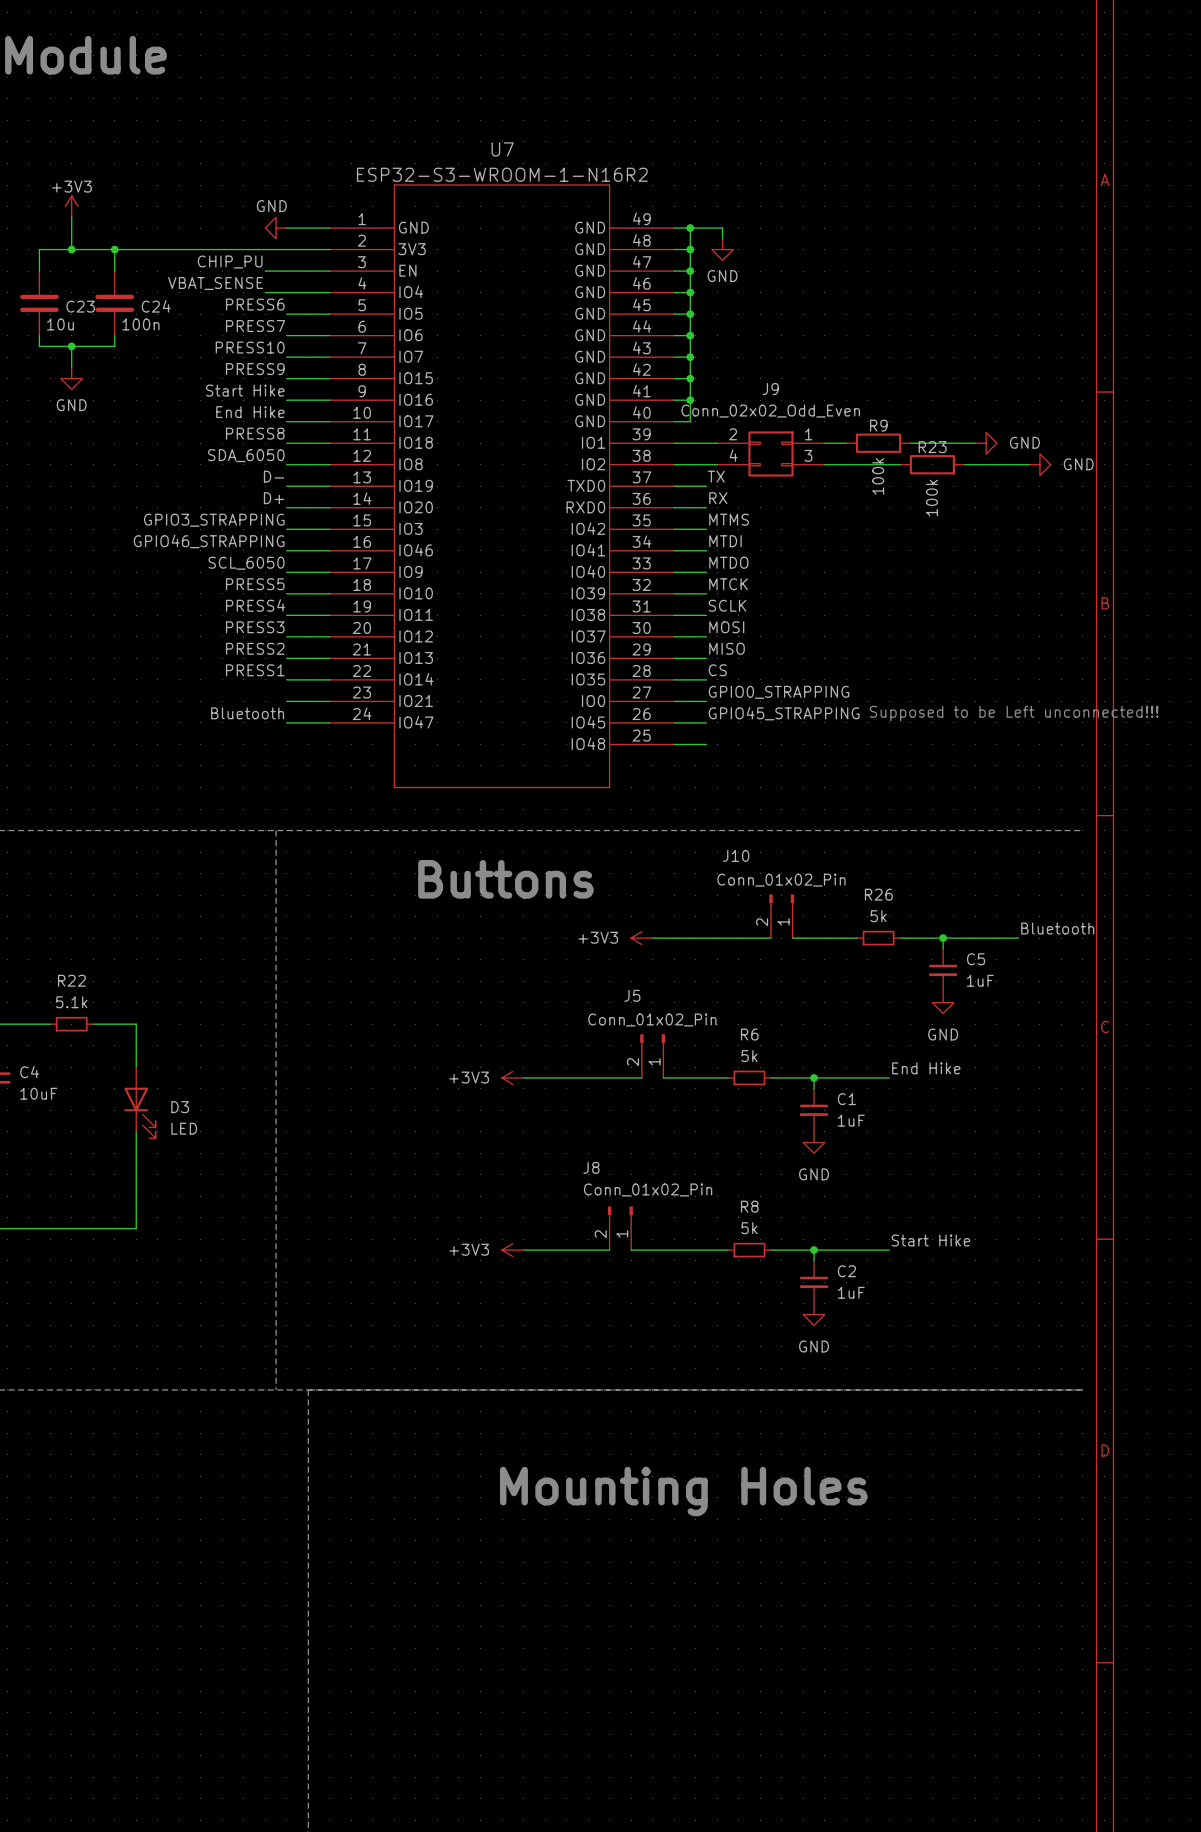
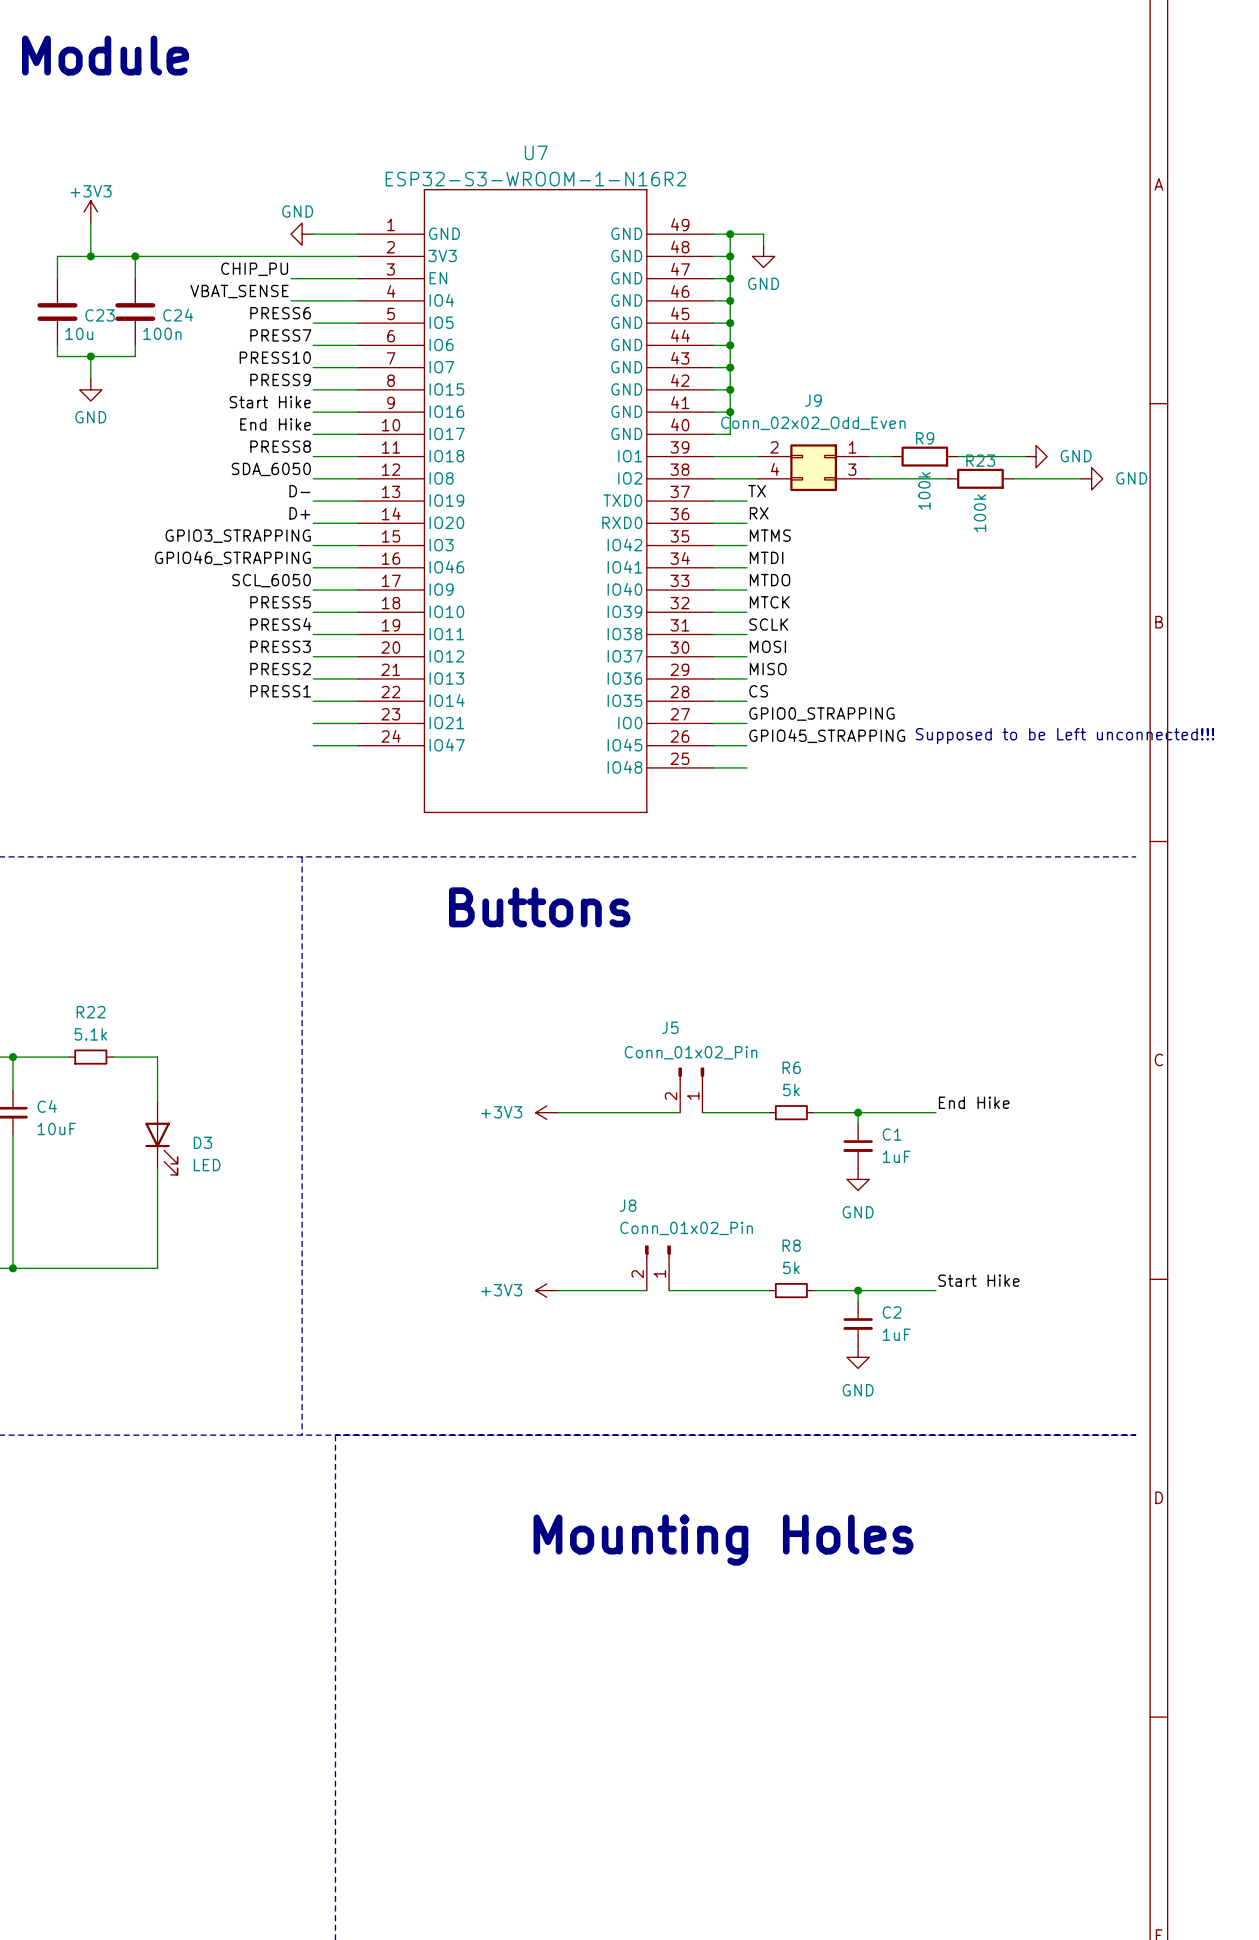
label: Bluetooth (247, 713) -> none
J10: Conn_01x02_Pin (781, 916) -> none
label: Bluetooth (1057, 928) -> none
power symbol: +3V3 (641, 938) -> none
wire: (652, 938) (770, 938) -> none
wire: (792, 938) (857, 938) -> none
R26: 5k (878, 938) -> none
wire: (900, 938) (1018, 938) -> none
wire: (943, 938) (943, 948) -> none
junction: (943, 938) -> none
C5: 1uF (943, 970) -> none
power symbol: GND (943, 1002) -> none

